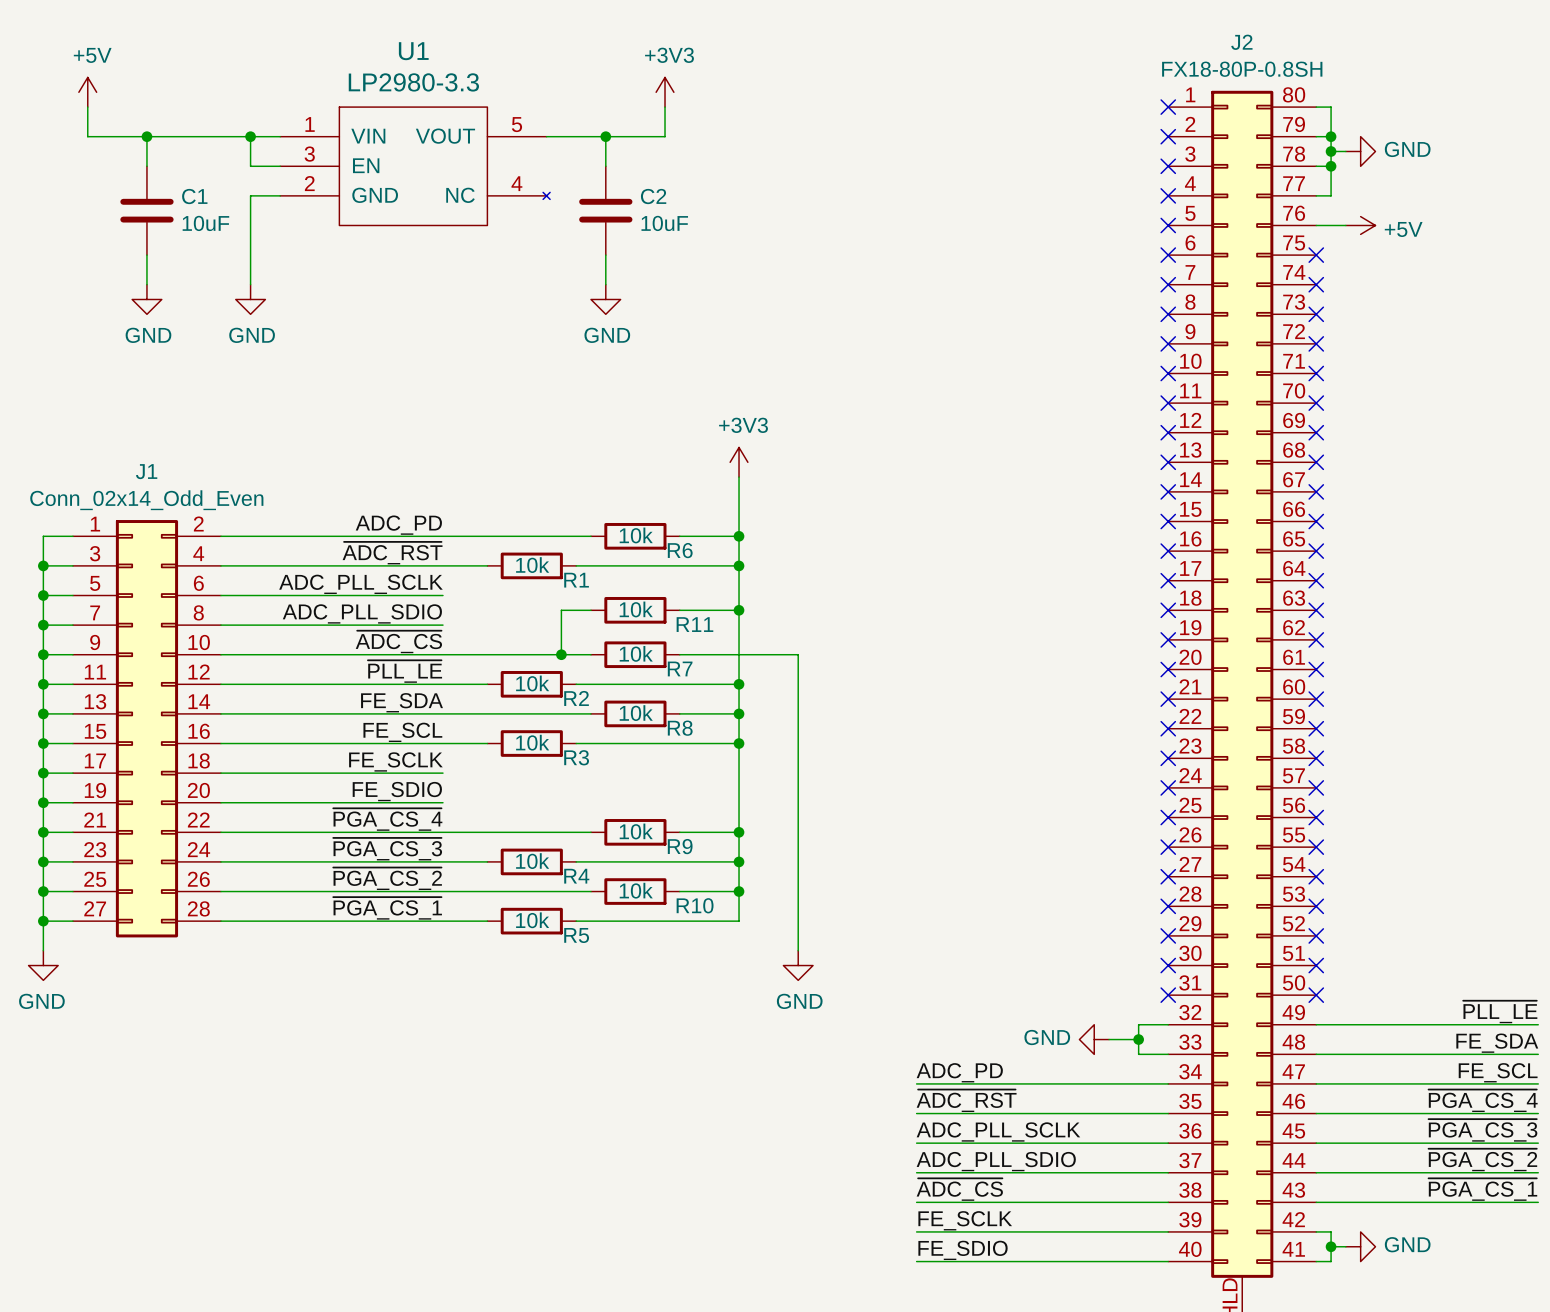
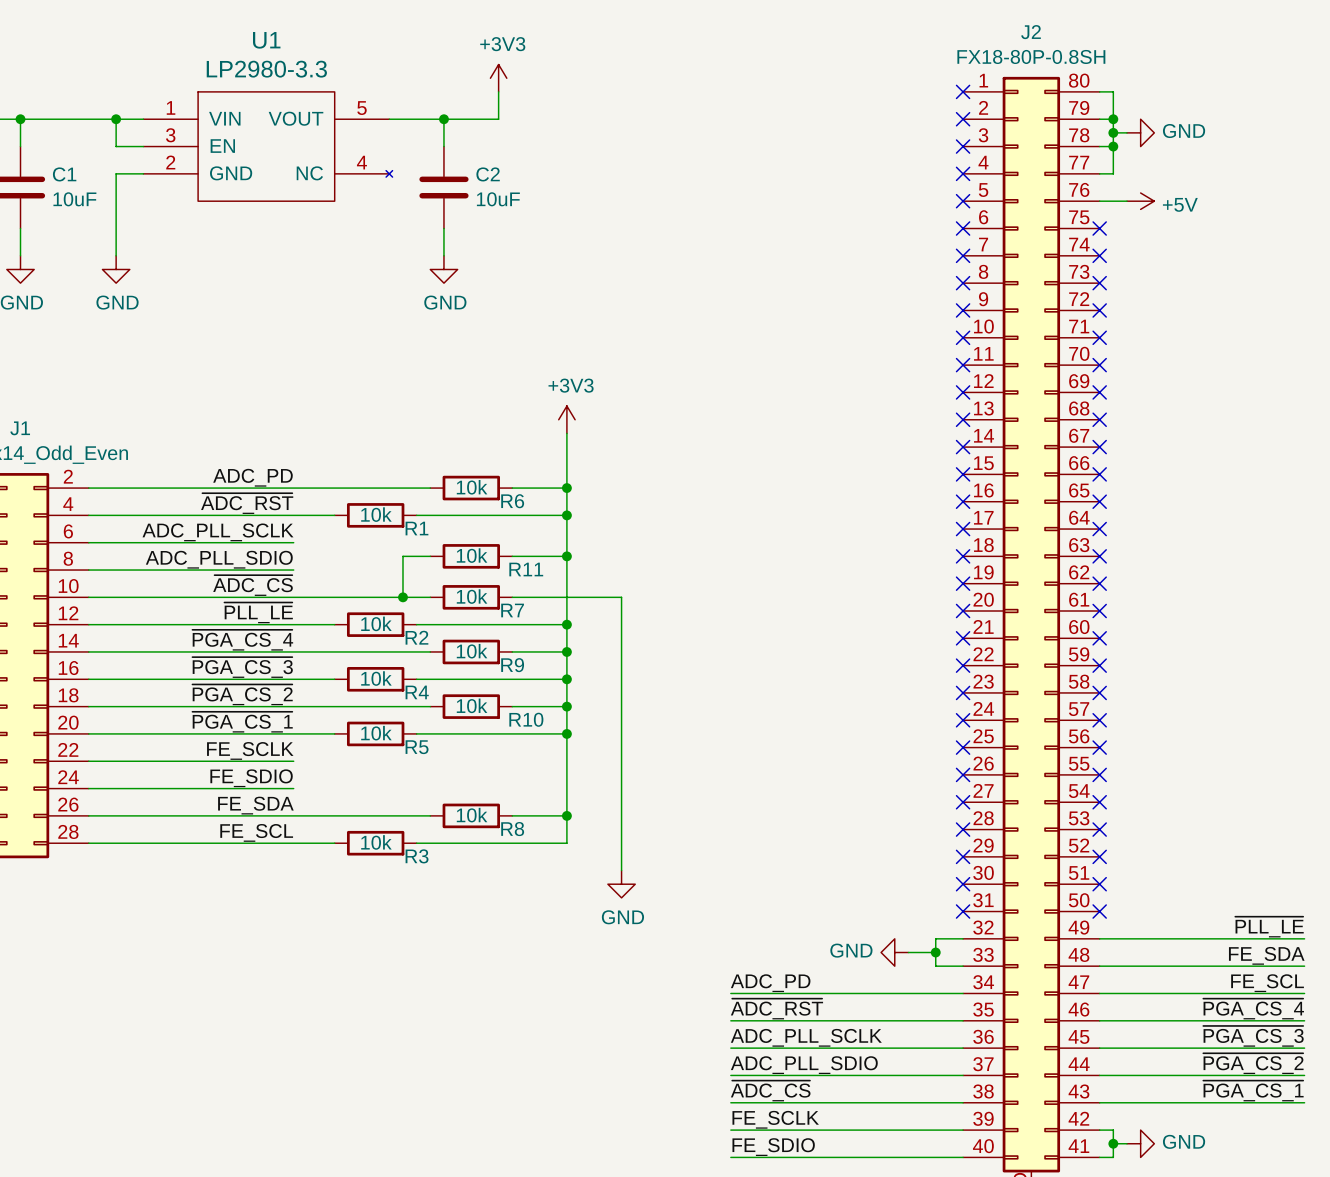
label: FE_SDA (402, 702) -> ~{PGA_CS_4} (242, 640)
R8 name: R8 (680, 728) -> R9 (512, 665)
label: FE_SCL (402, 732) -> ~{PGA_CS_3} (242, 667)
R3 name: R3 (576, 757) -> R4 (417, 692)
label: FE_SCLK (395, 761) -> ~{PGA_CS_2} (242, 694)
R10: none -> 10k (471, 706)
junction: none -> (566, 706)
label: FE_SDIO (397, 791) -> ~{PGA_CS_1} (242, 722)
R5: none -> 10k (375, 733)
junction: none -> (566, 733)
label: ~{PGA_CS_4} (387, 819) -> FE_SCLK (250, 750)
wire: (442, 832) (591, 832) -> (293, 706) (430, 706)
R9: 10k (635, 832) -> none
wire: (679, 832) (739, 832) -> (512, 706) (566, 706)
junction: (739, 832) -> none
label: ~{PGA_CS_3} (387, 849) -> FE_SDIO (251, 778)
wire: (442, 861) (487, 861) -> (293, 733) (334, 733)
R4: 10k (531, 861) -> none
wire: (576, 861) (739, 861) -> (416, 733) (566, 733)
junction: (739, 861) -> none
label: ~{PGA_CS_2} (387, 878) -> FE_SDA (255, 805)
R10 name: R10 (695, 905) -> R8 (512, 829)
label: ~{PGA_CS_1} (387, 908) -> FE_SCL (256, 832)
R5 name: R5 (576, 935) -> R3 (417, 856)

